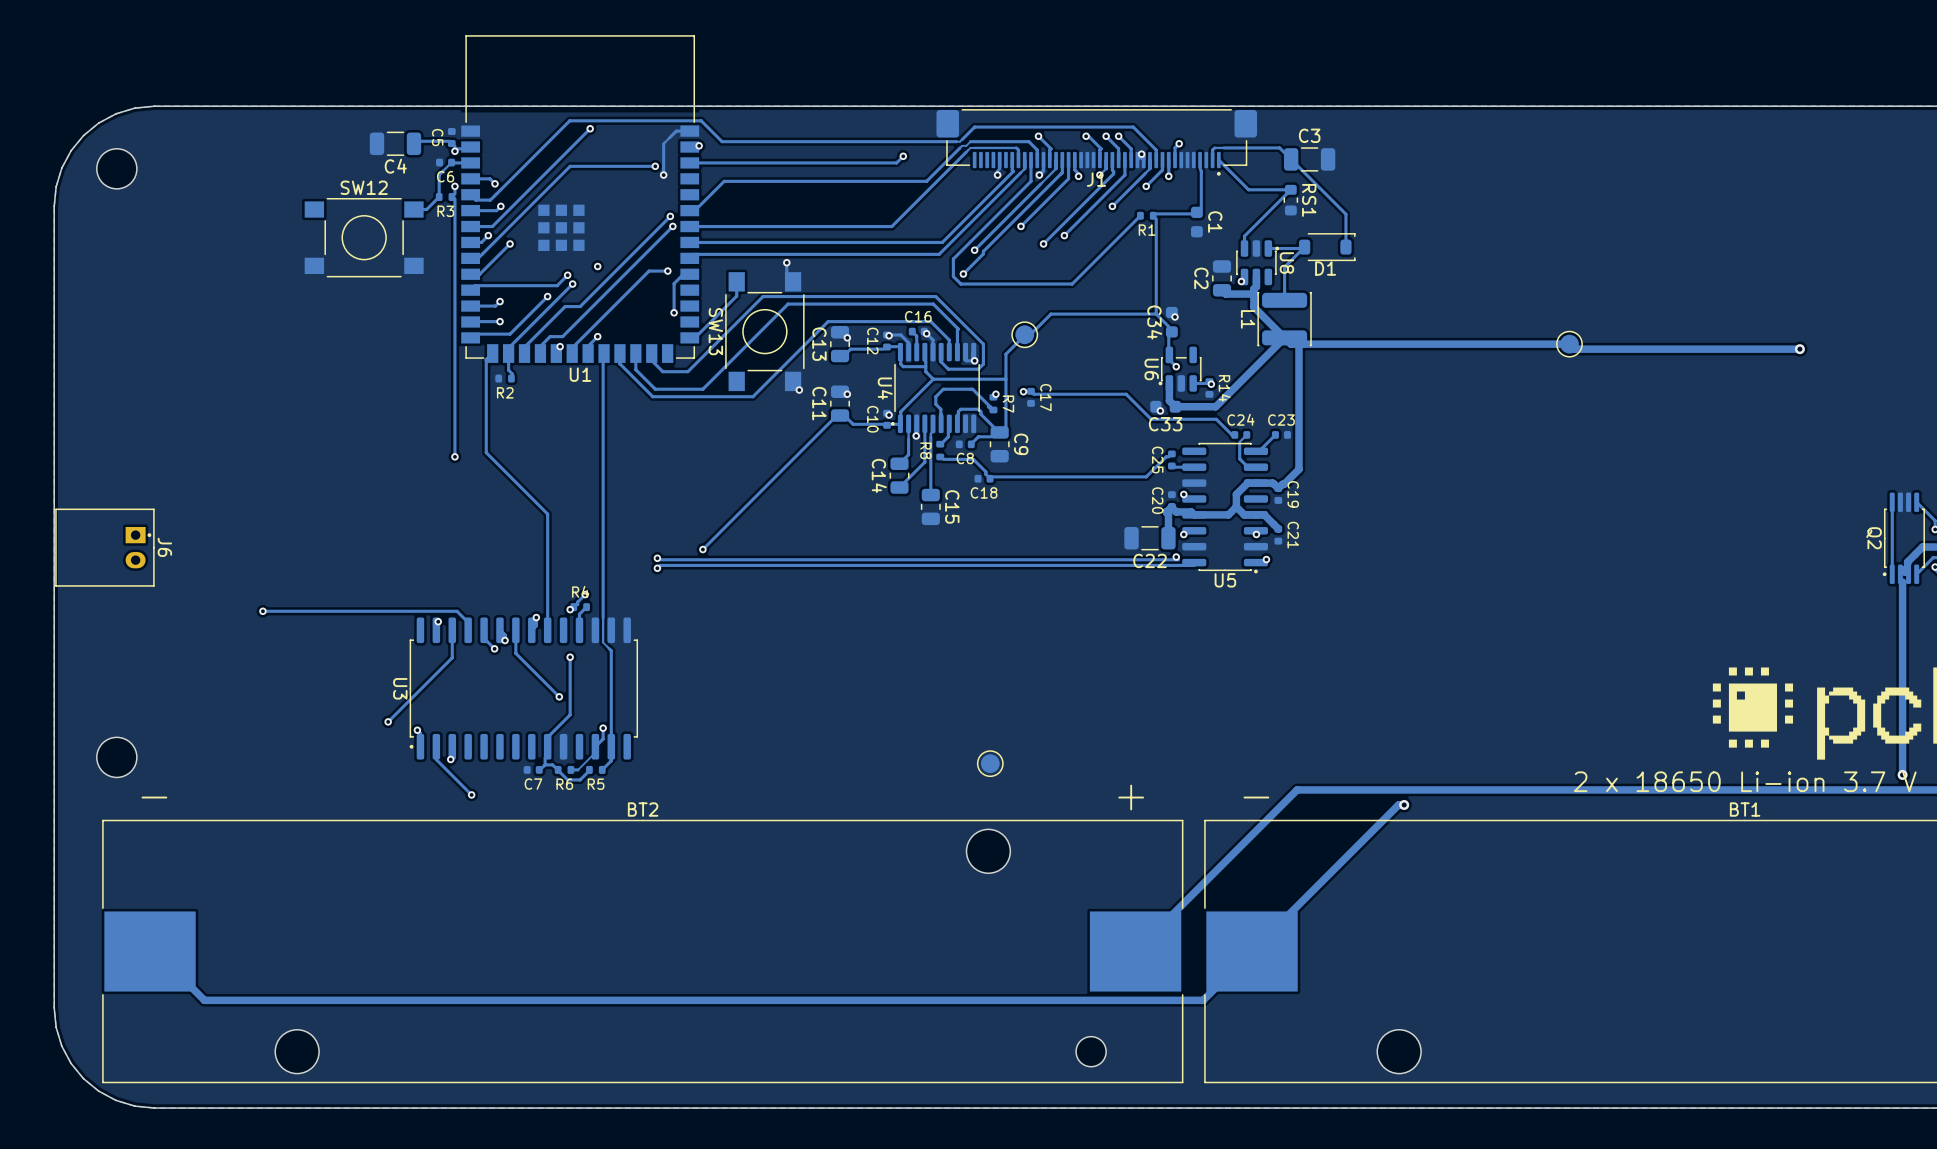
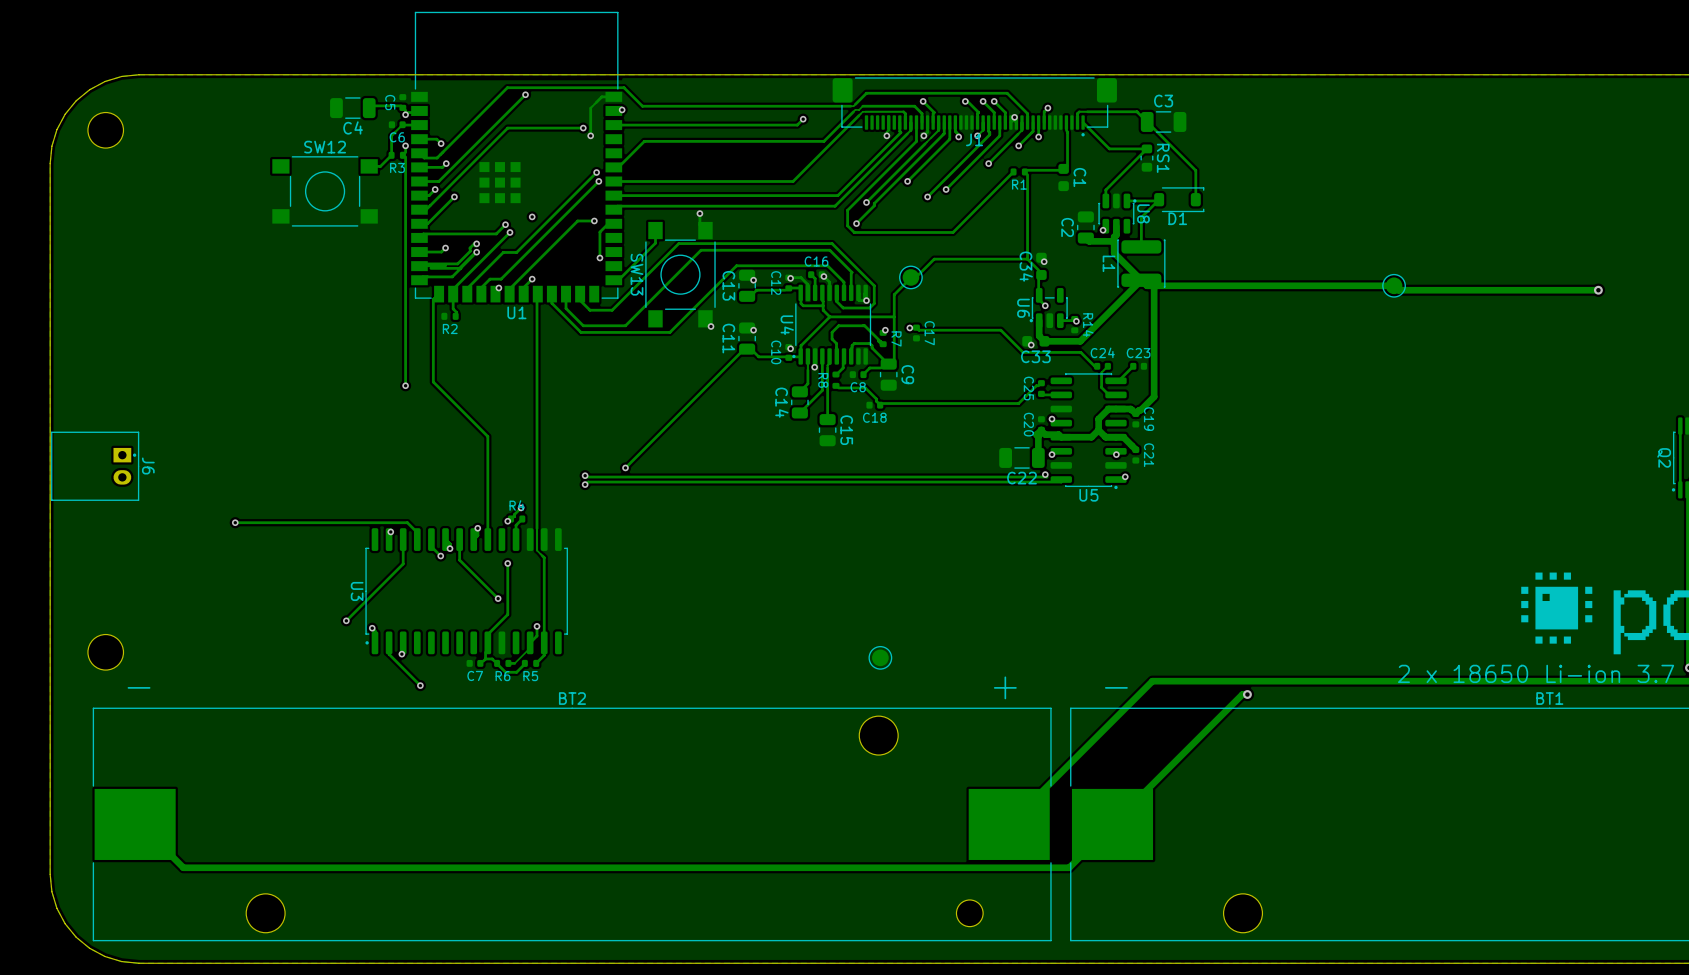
via: none -> (476, 243)
track: (547, 296) (510, 334) (507, 334) -> (461, 268) (452, 276)
via: (547, 296) -> none
track: none -> (475, 246) (476, 243) (470, 248) (470, 251) (457, 263) (419, 263) (419, 266)
via: none -> (476, 252)
via: (500, 321) -> none
track: none -> (459, 268) (476, 250) (460, 268) (430, 268)

